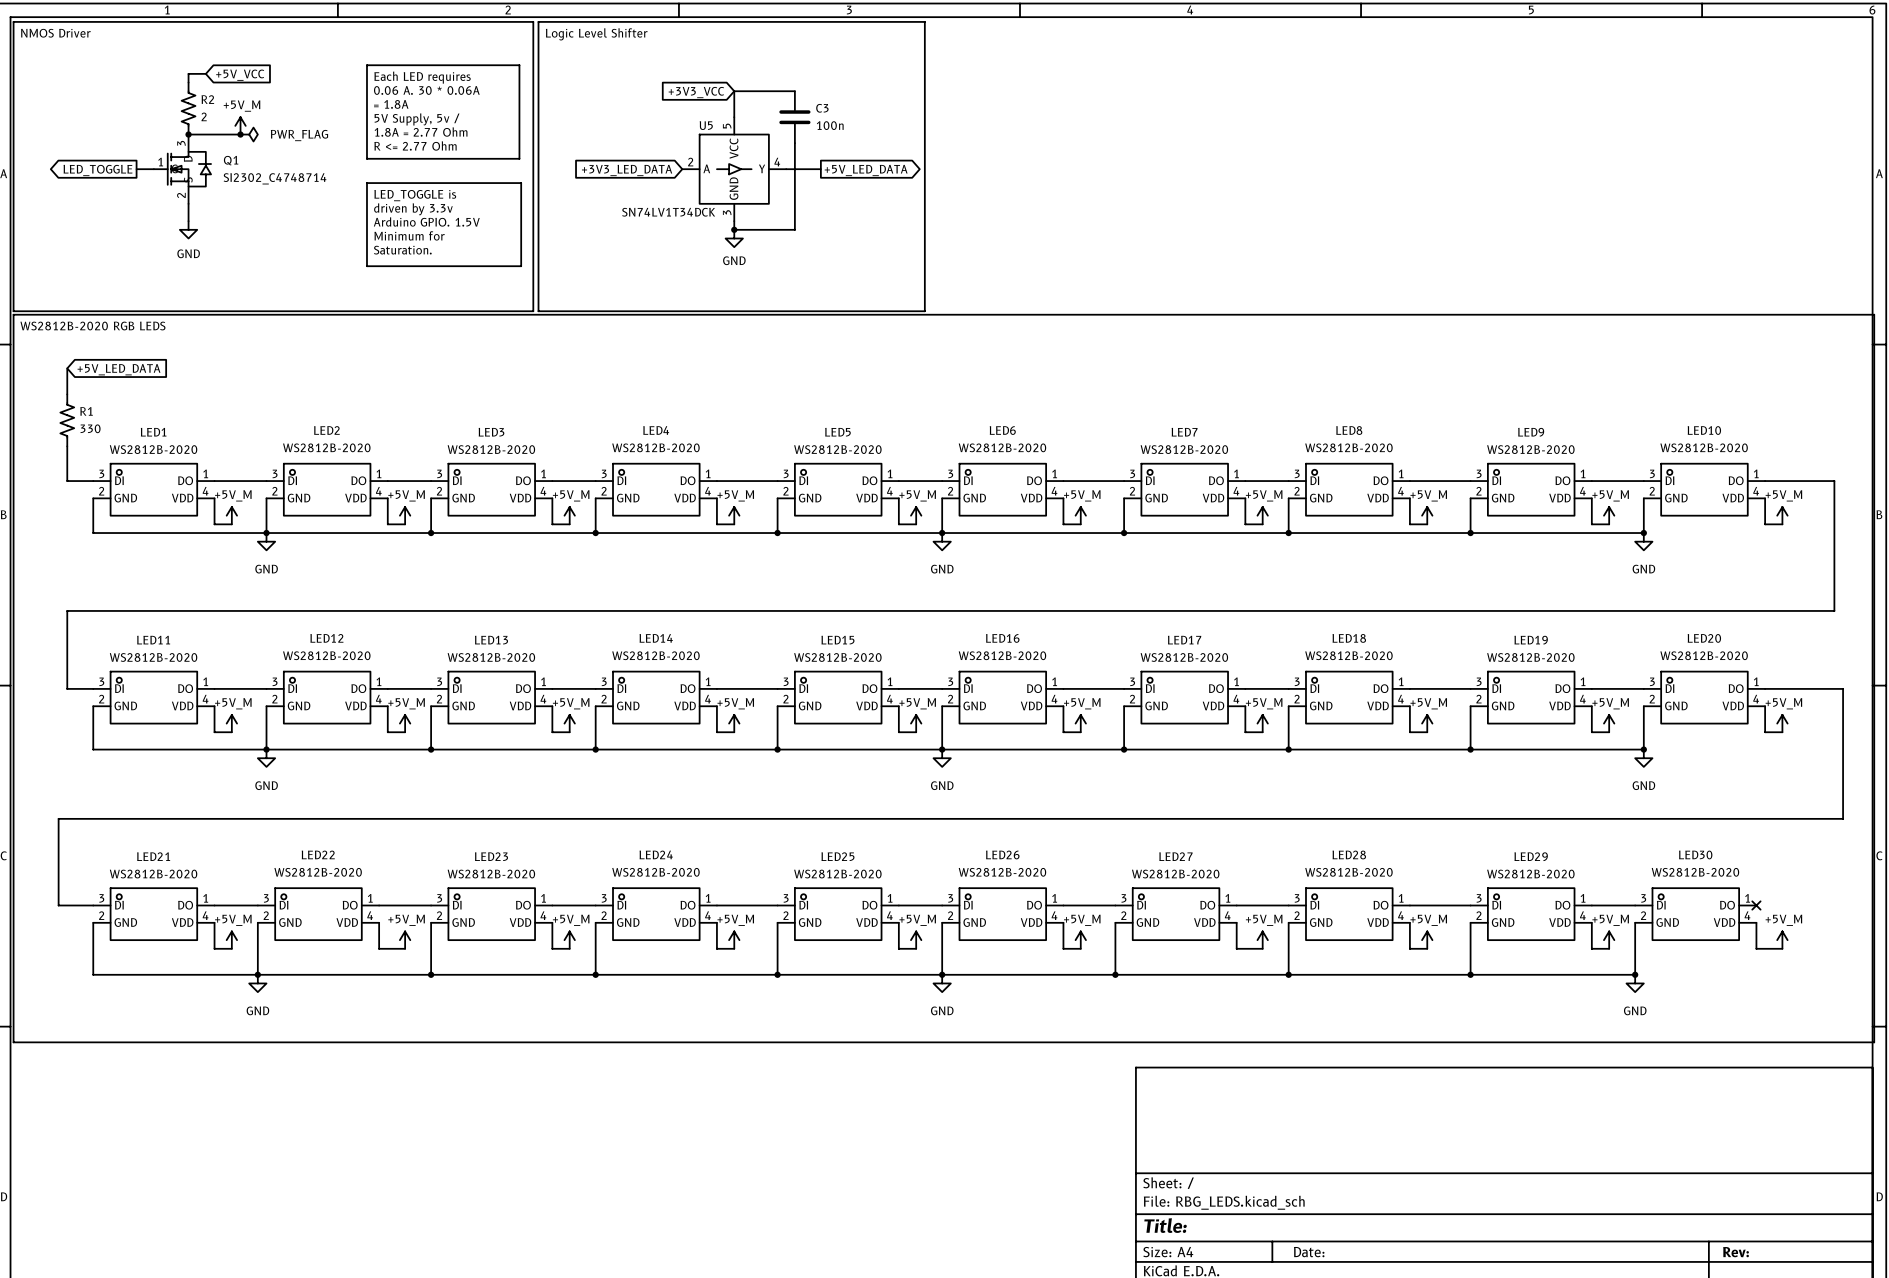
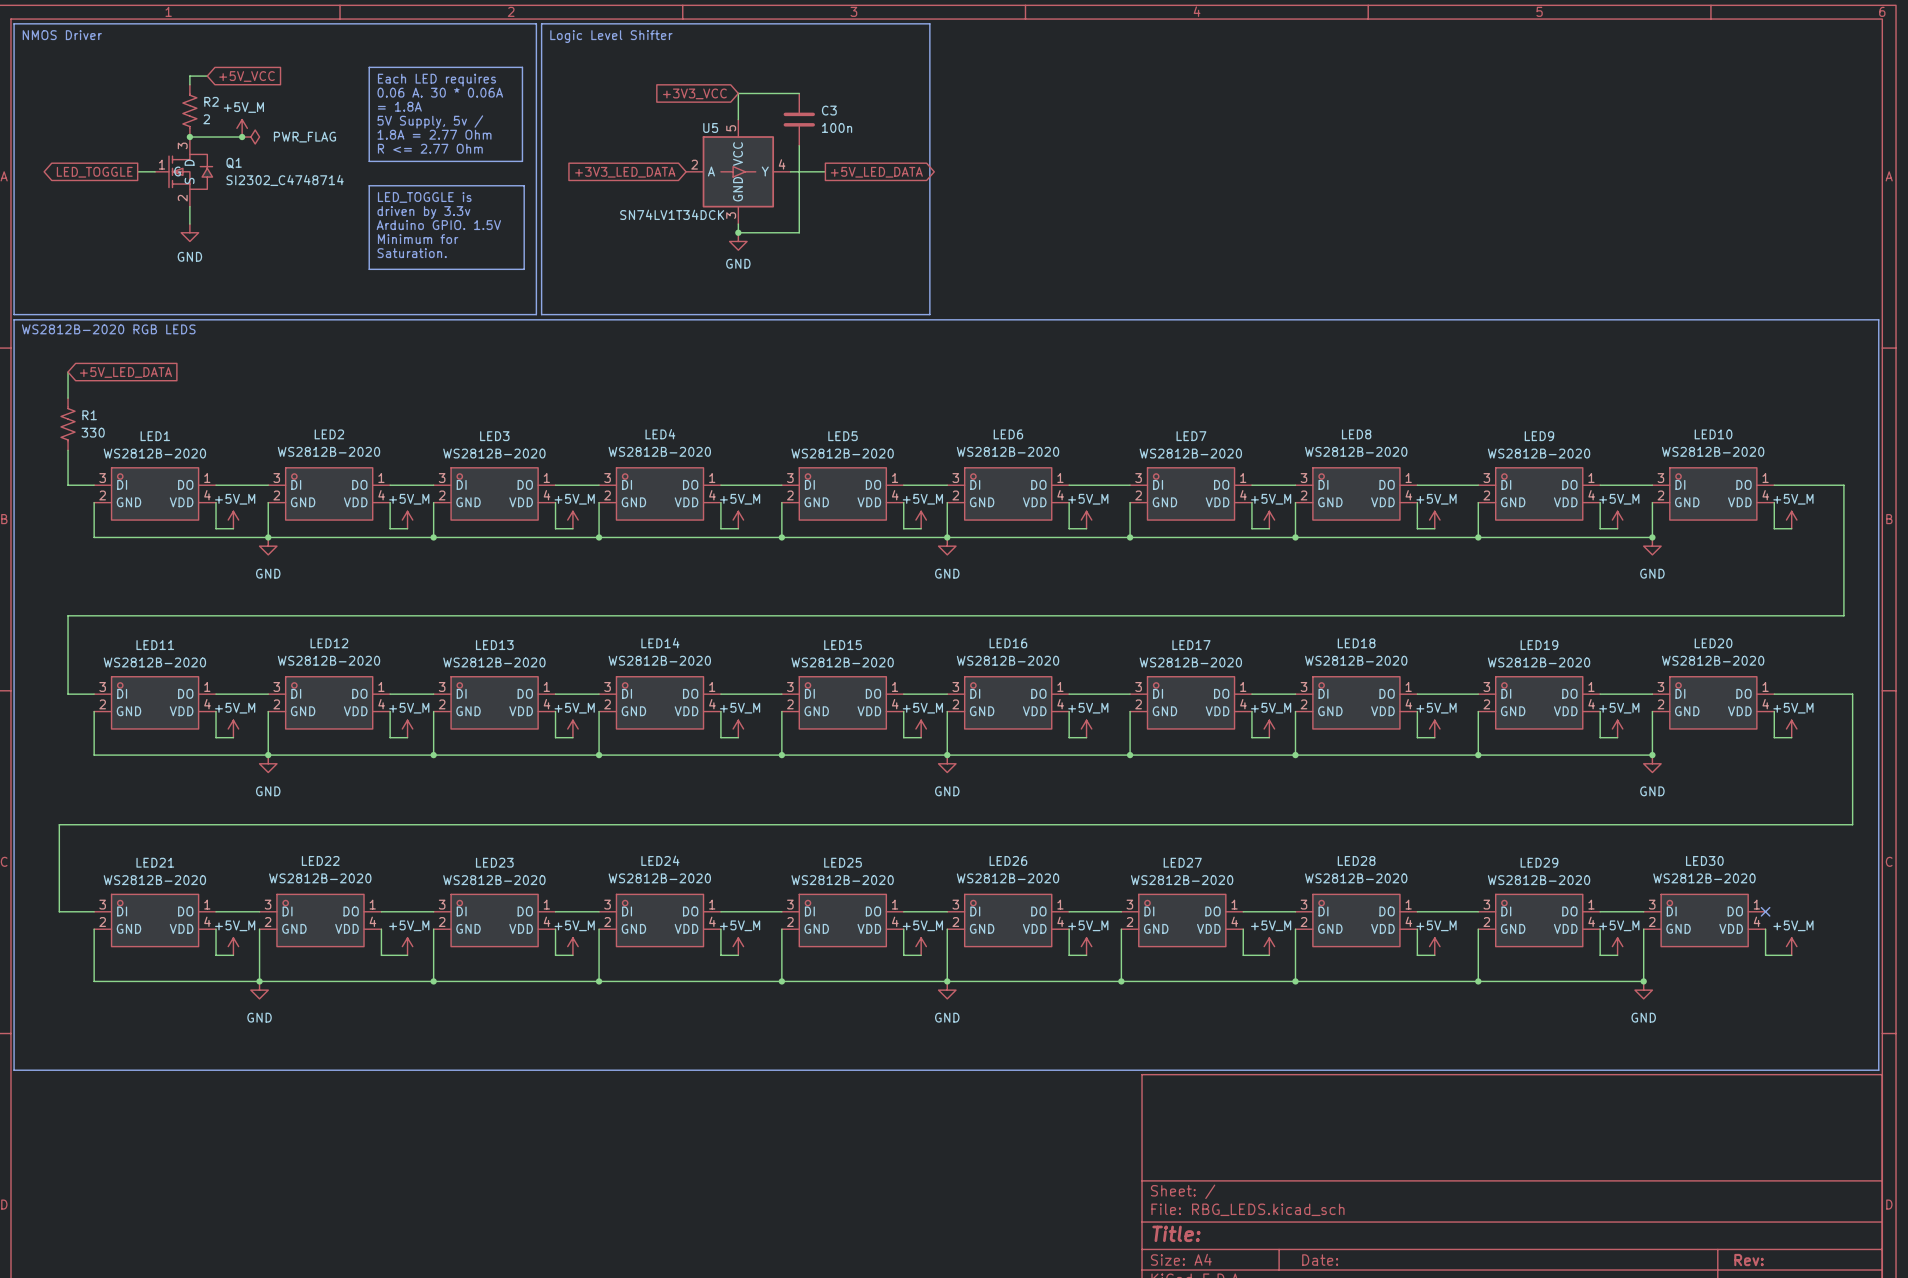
line: (13, 316) (13, 314) (1874, 314) (1874, 1042) (13, 1042) -> (14, 319) (1878, 319) (1878, 1070) (14, 1070) (14, 1049)

